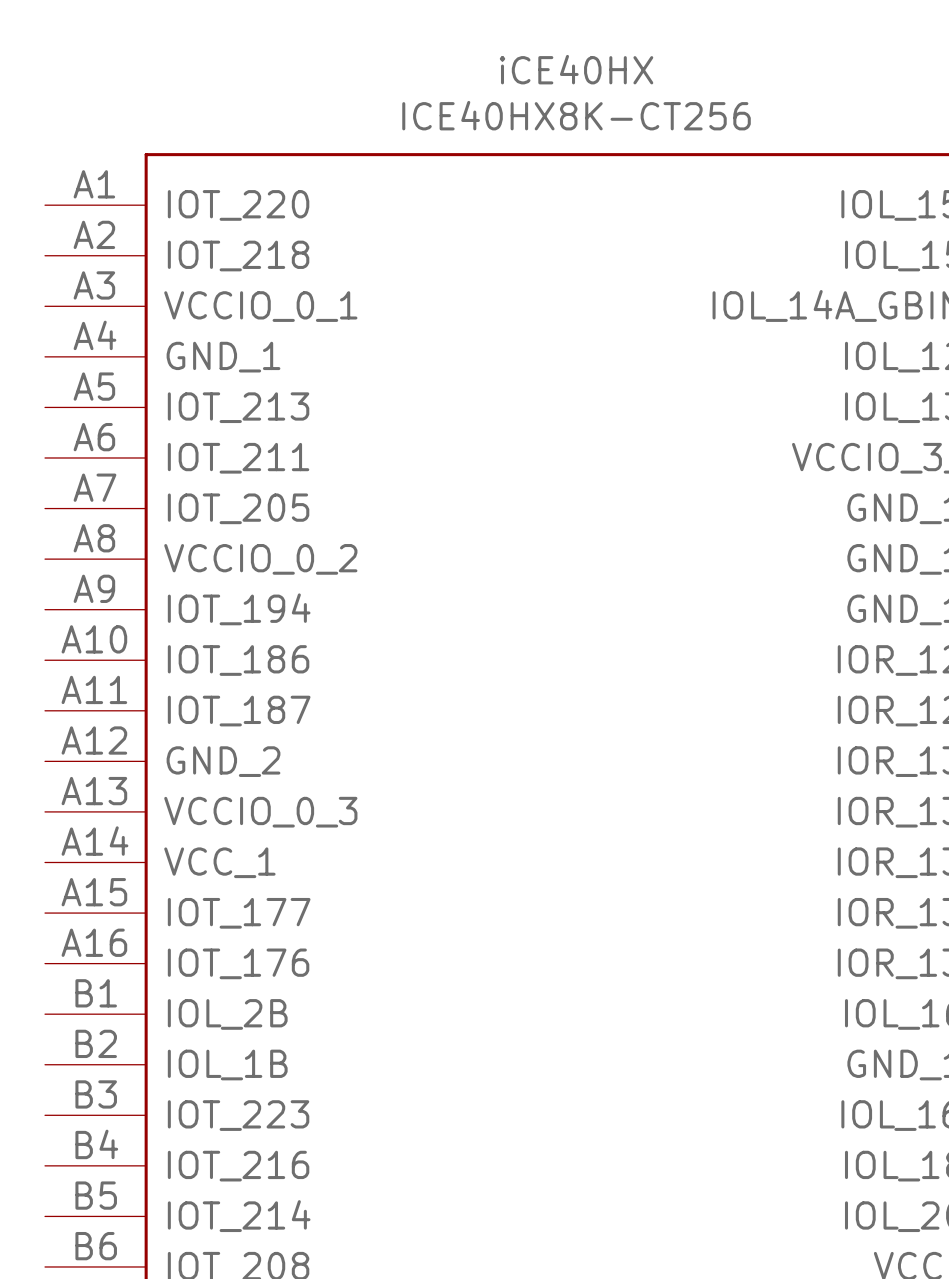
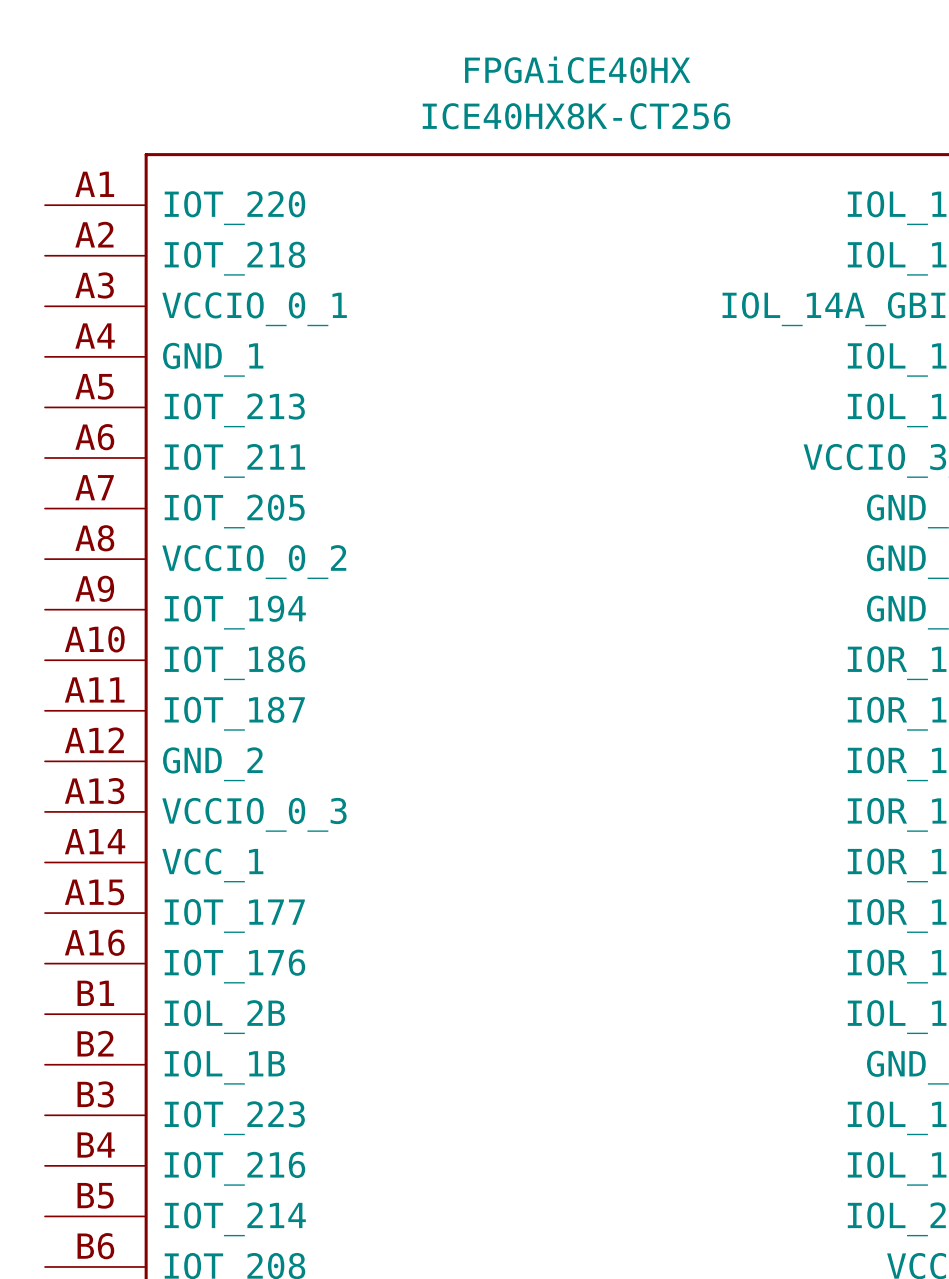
iCE40HX name: iCE40HX (576, 69) -> FPGAiCE40HX (577, 69)

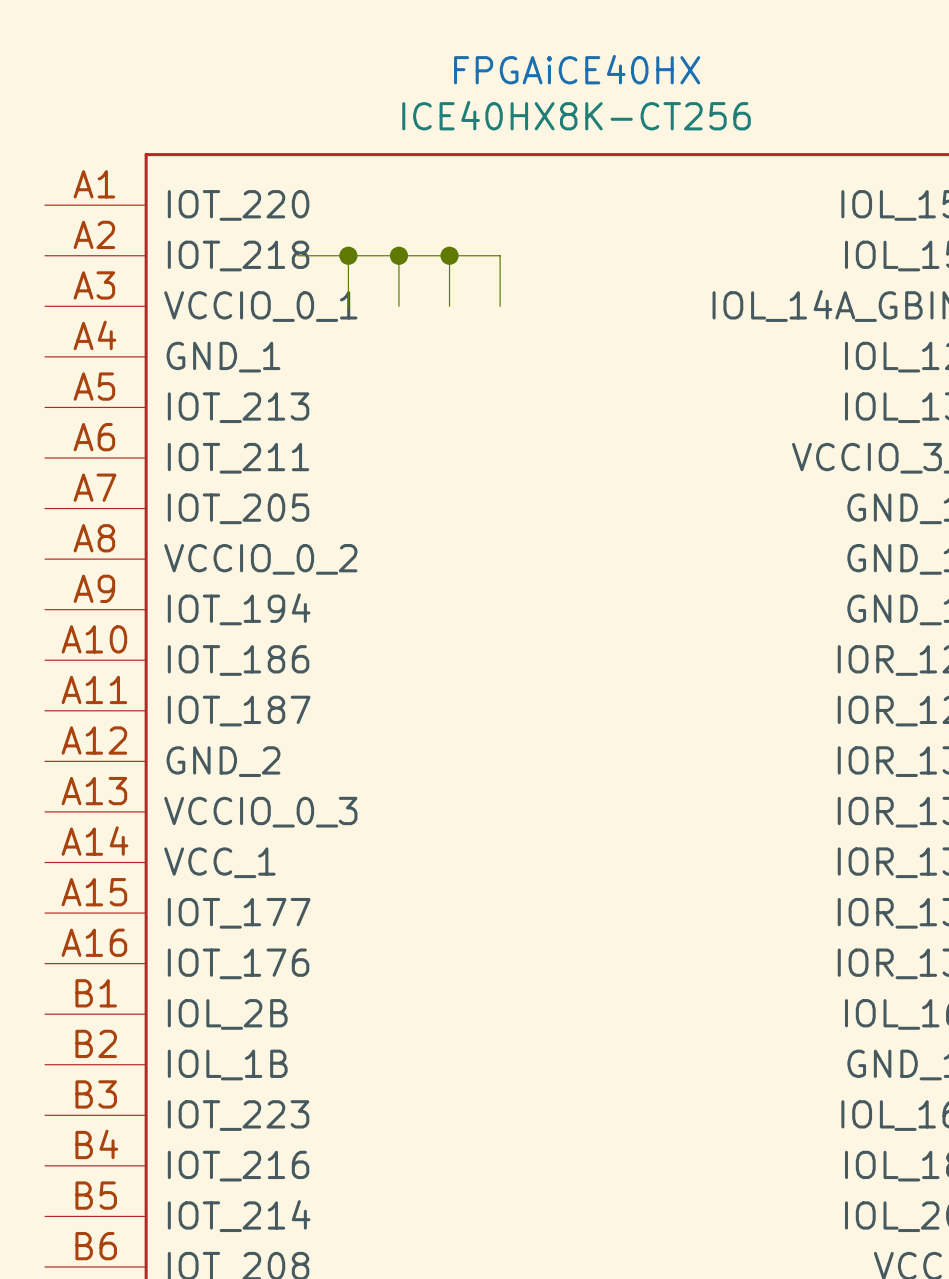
wire: none -> (297, 255) (500, 255) (500, 306)
wire: none -> (348, 255) (348, 306)
junction: none -> (348, 255)
wire: none -> (398, 255) (398, 306)
junction: none -> (398, 255)
wire: none -> (449, 255) (449, 306)
junction: none -> (449, 255)

